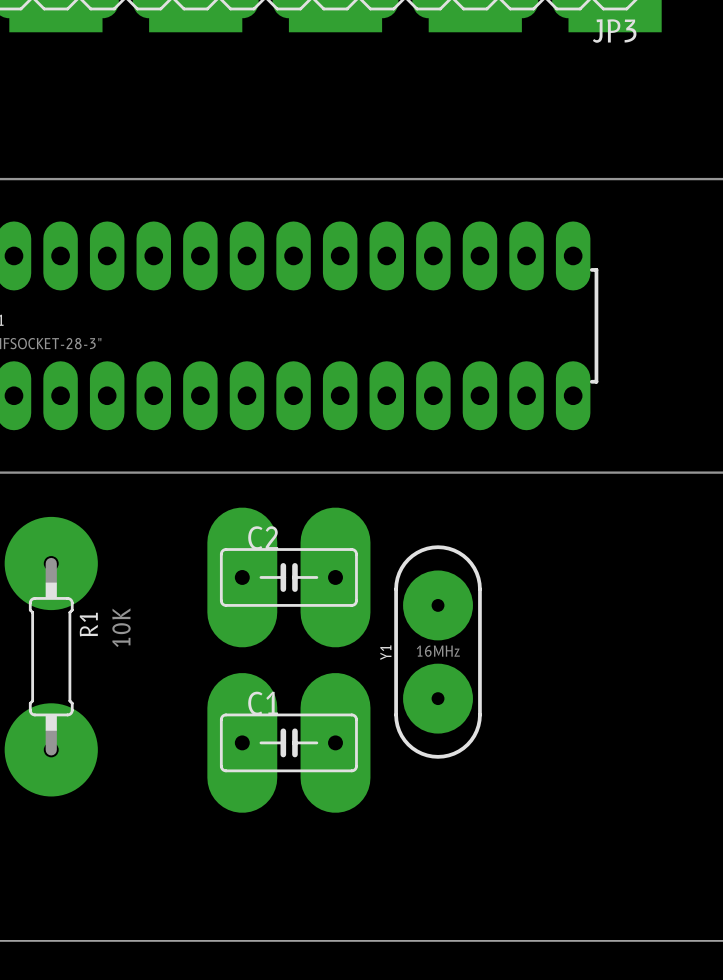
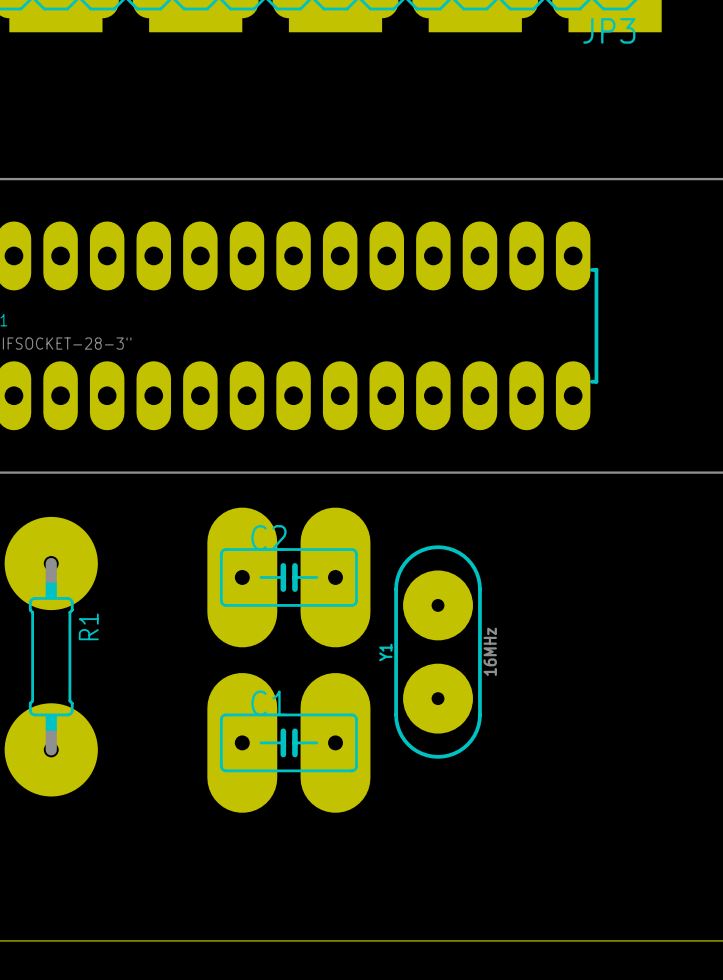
R1 value: 10K (121, 627) -> none
Y1 value rotation: 0° (438, 651) -> 90° counterclockwise (490, 651)

